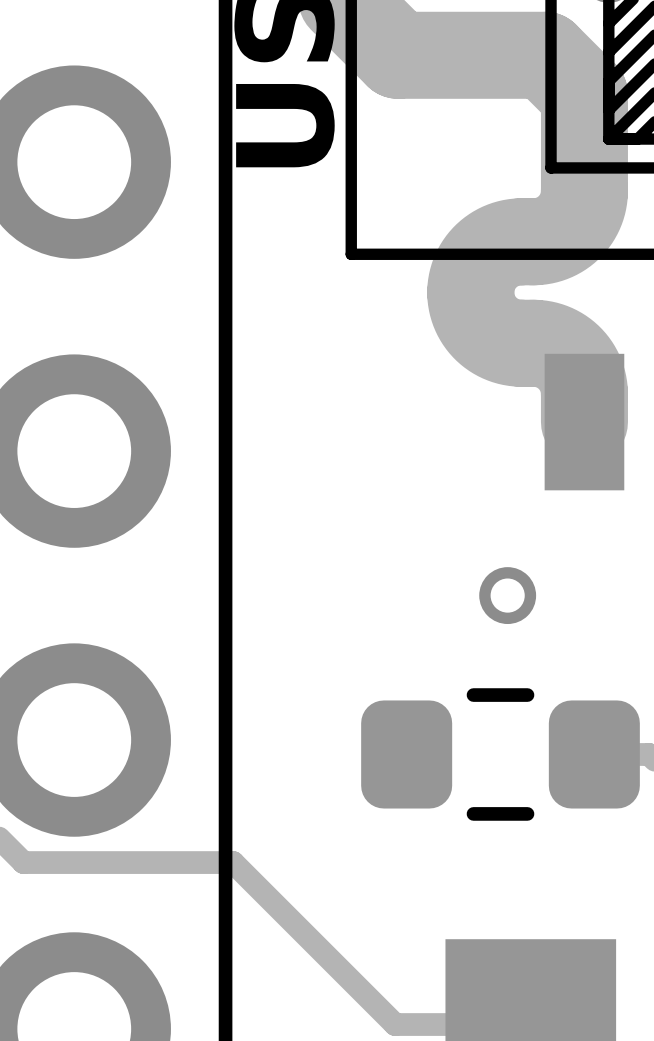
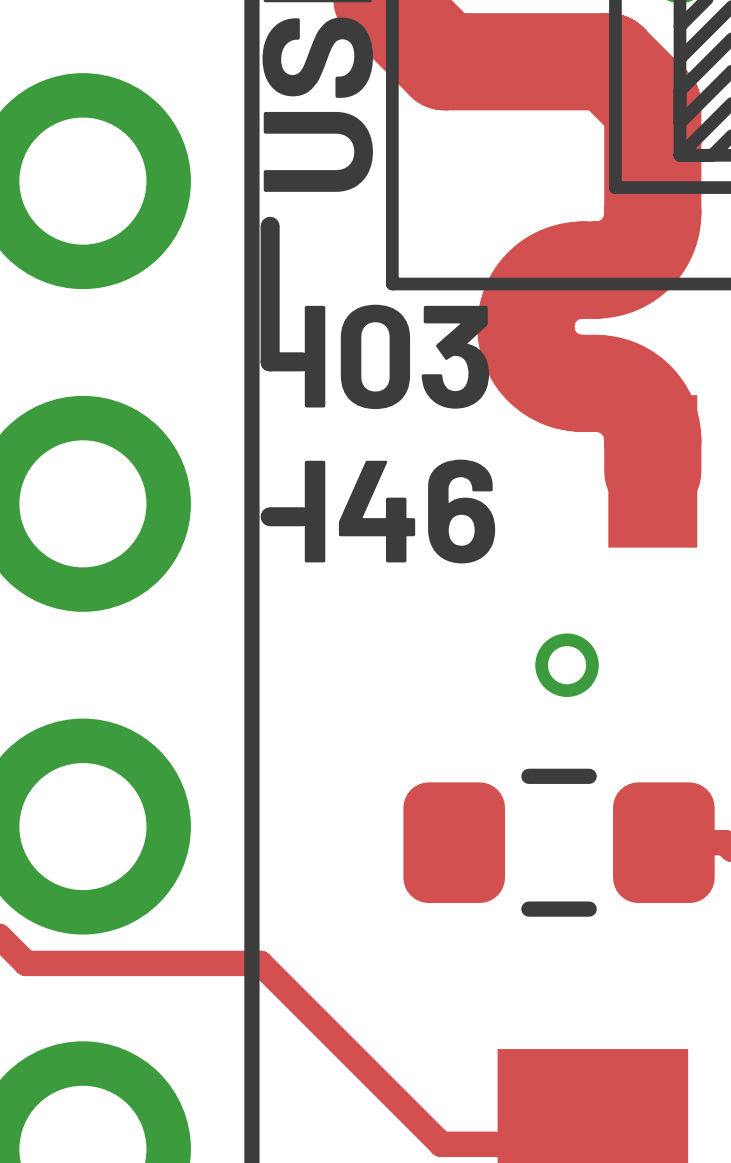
line: none -> (270, 226) (270, 361) (302, 361)
text: none -> I03 (396, 356)
text: none -> I46 (399, 511)
line: none -> (270, 516) (302, 516)

